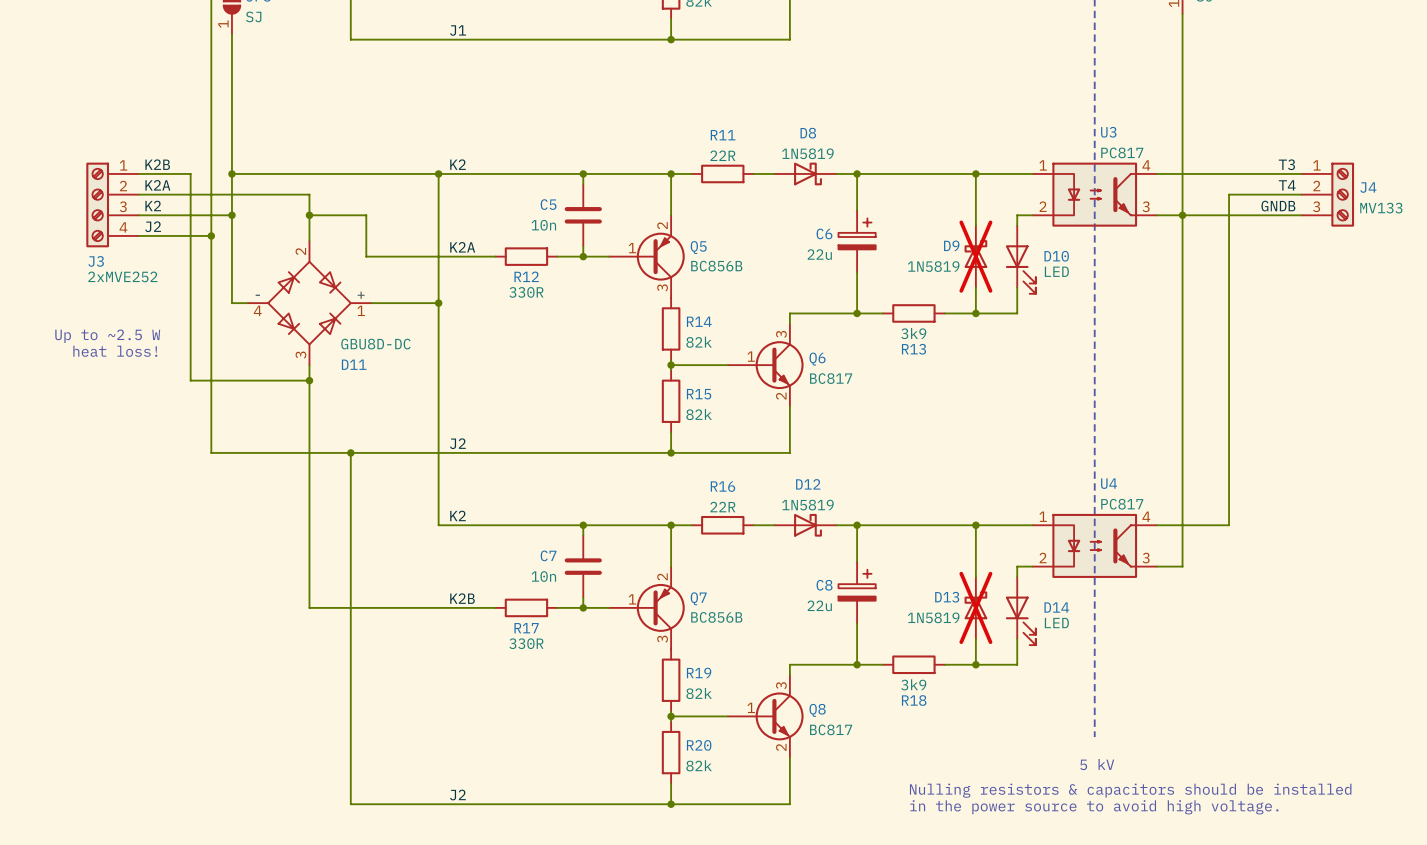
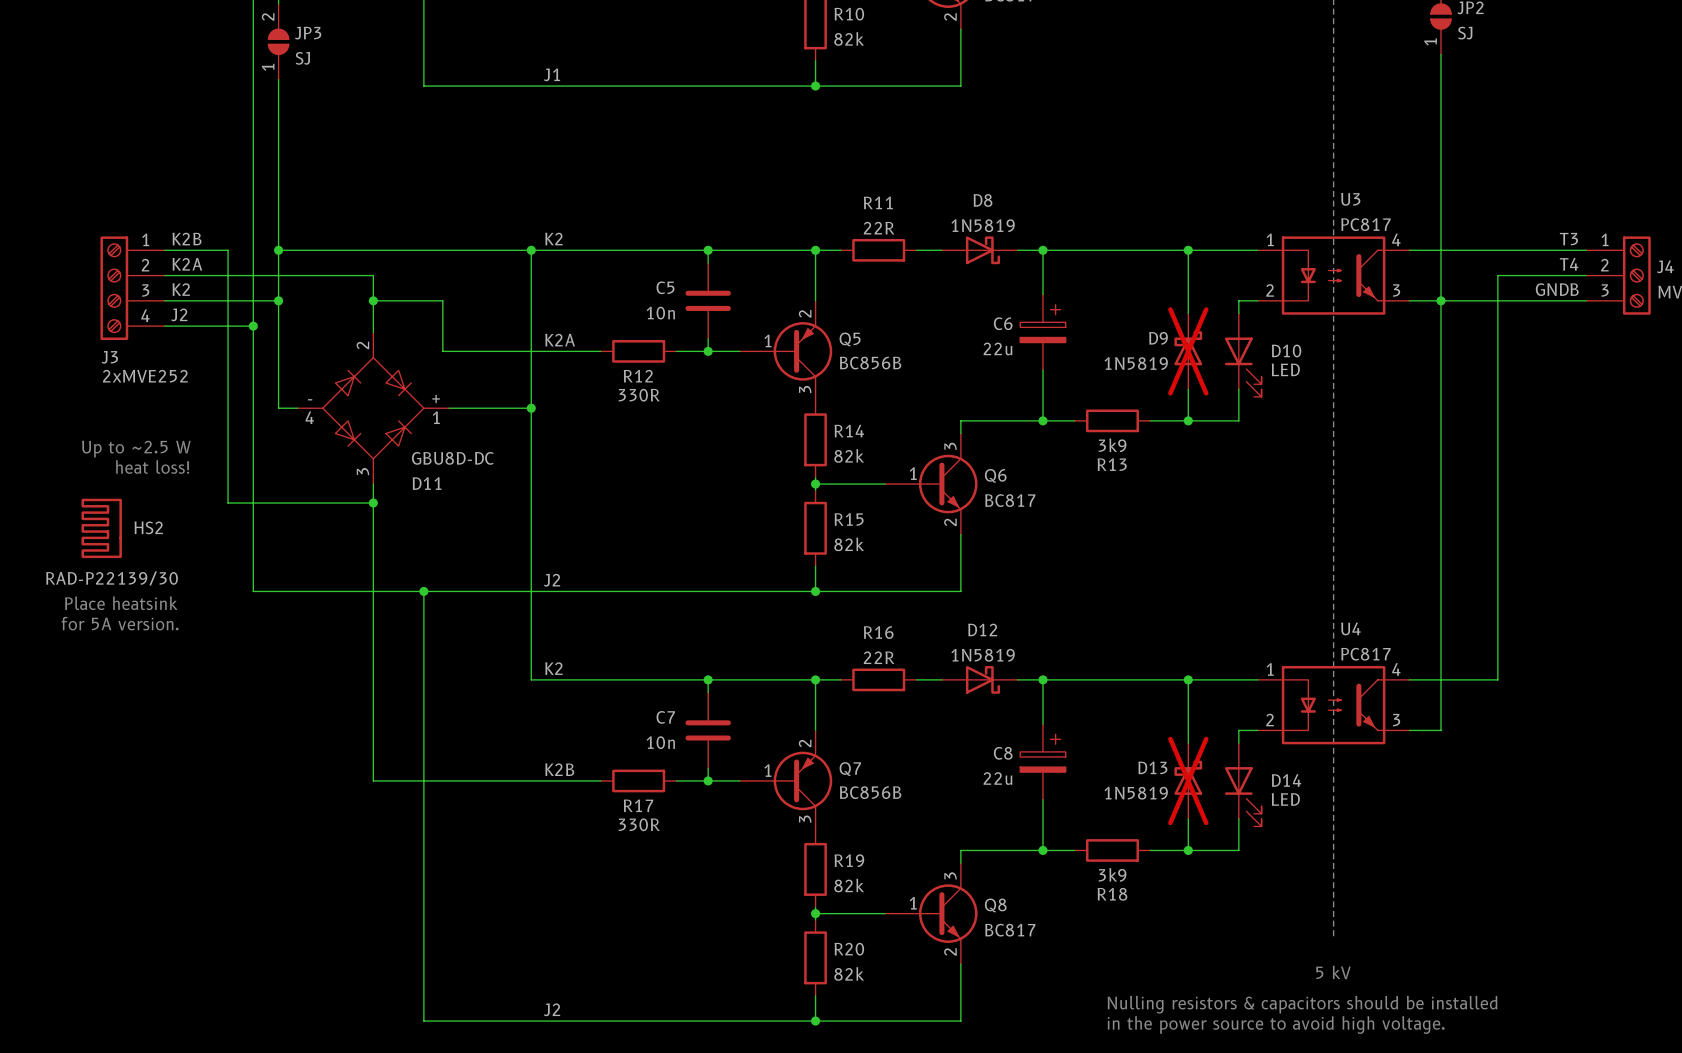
HS2: none -> RAD-P22139/30 (101, 528)
text: none -> Place heatsink (121, 603)
text: none -> for 5A version. (120, 623)

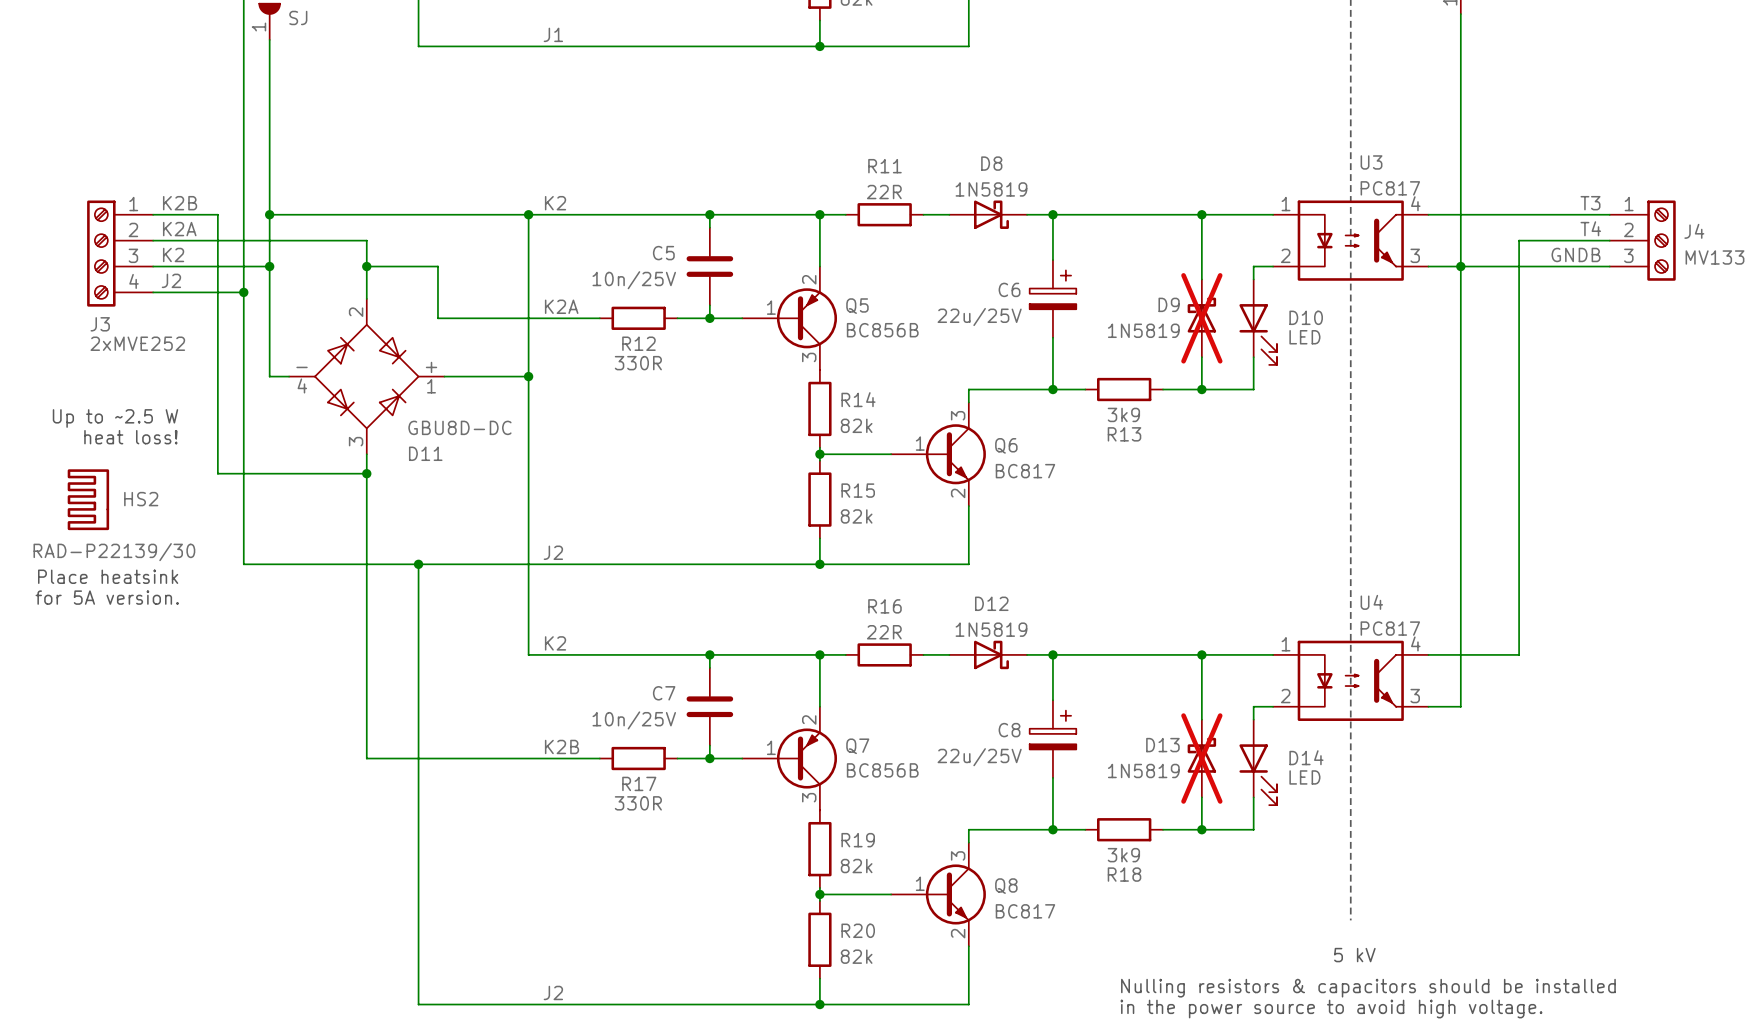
C5 value: 10n (660, 313) -> 10n/25V (634, 280)
C6 value: 22u (997, 348) -> 22u/25V (979, 316)
C7 value: 10n (660, 742) -> 10n/25V (634, 720)
C8 value: 22u (997, 778) -> 22u/25V (979, 757)

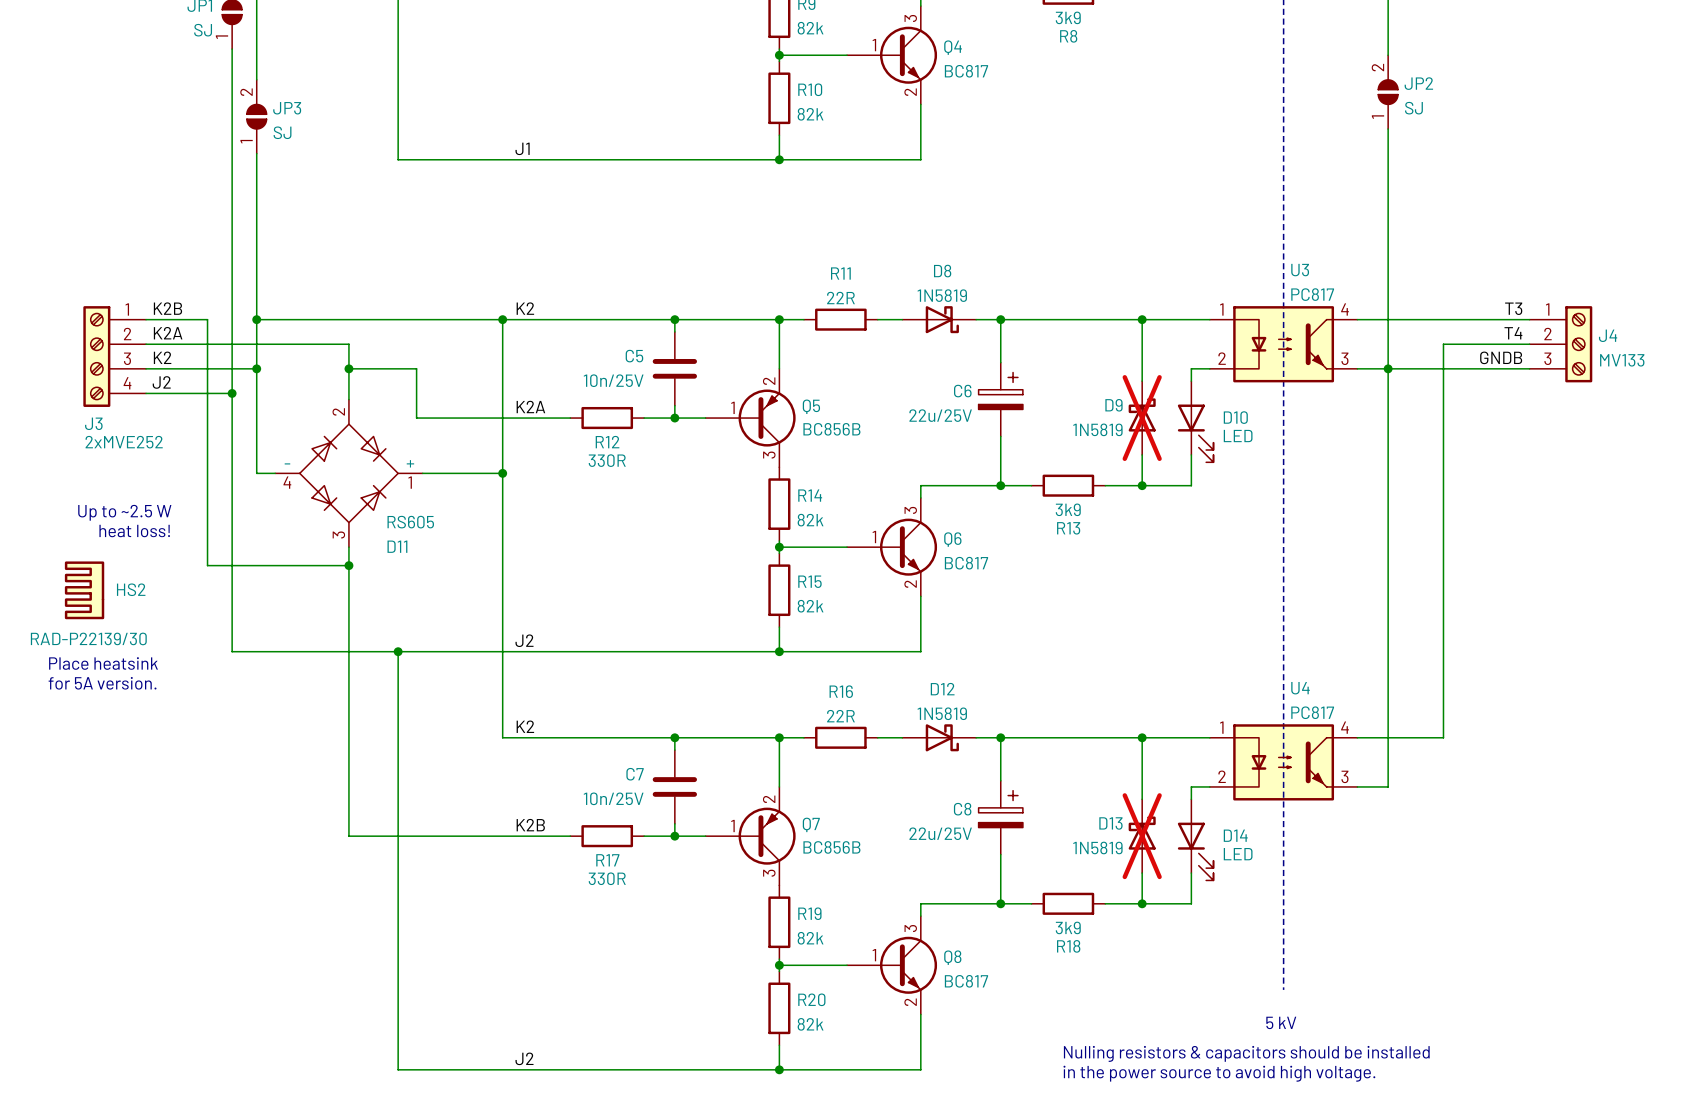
D11 value: GBU8D-DC (459, 427) -> RS605 (410, 522)

